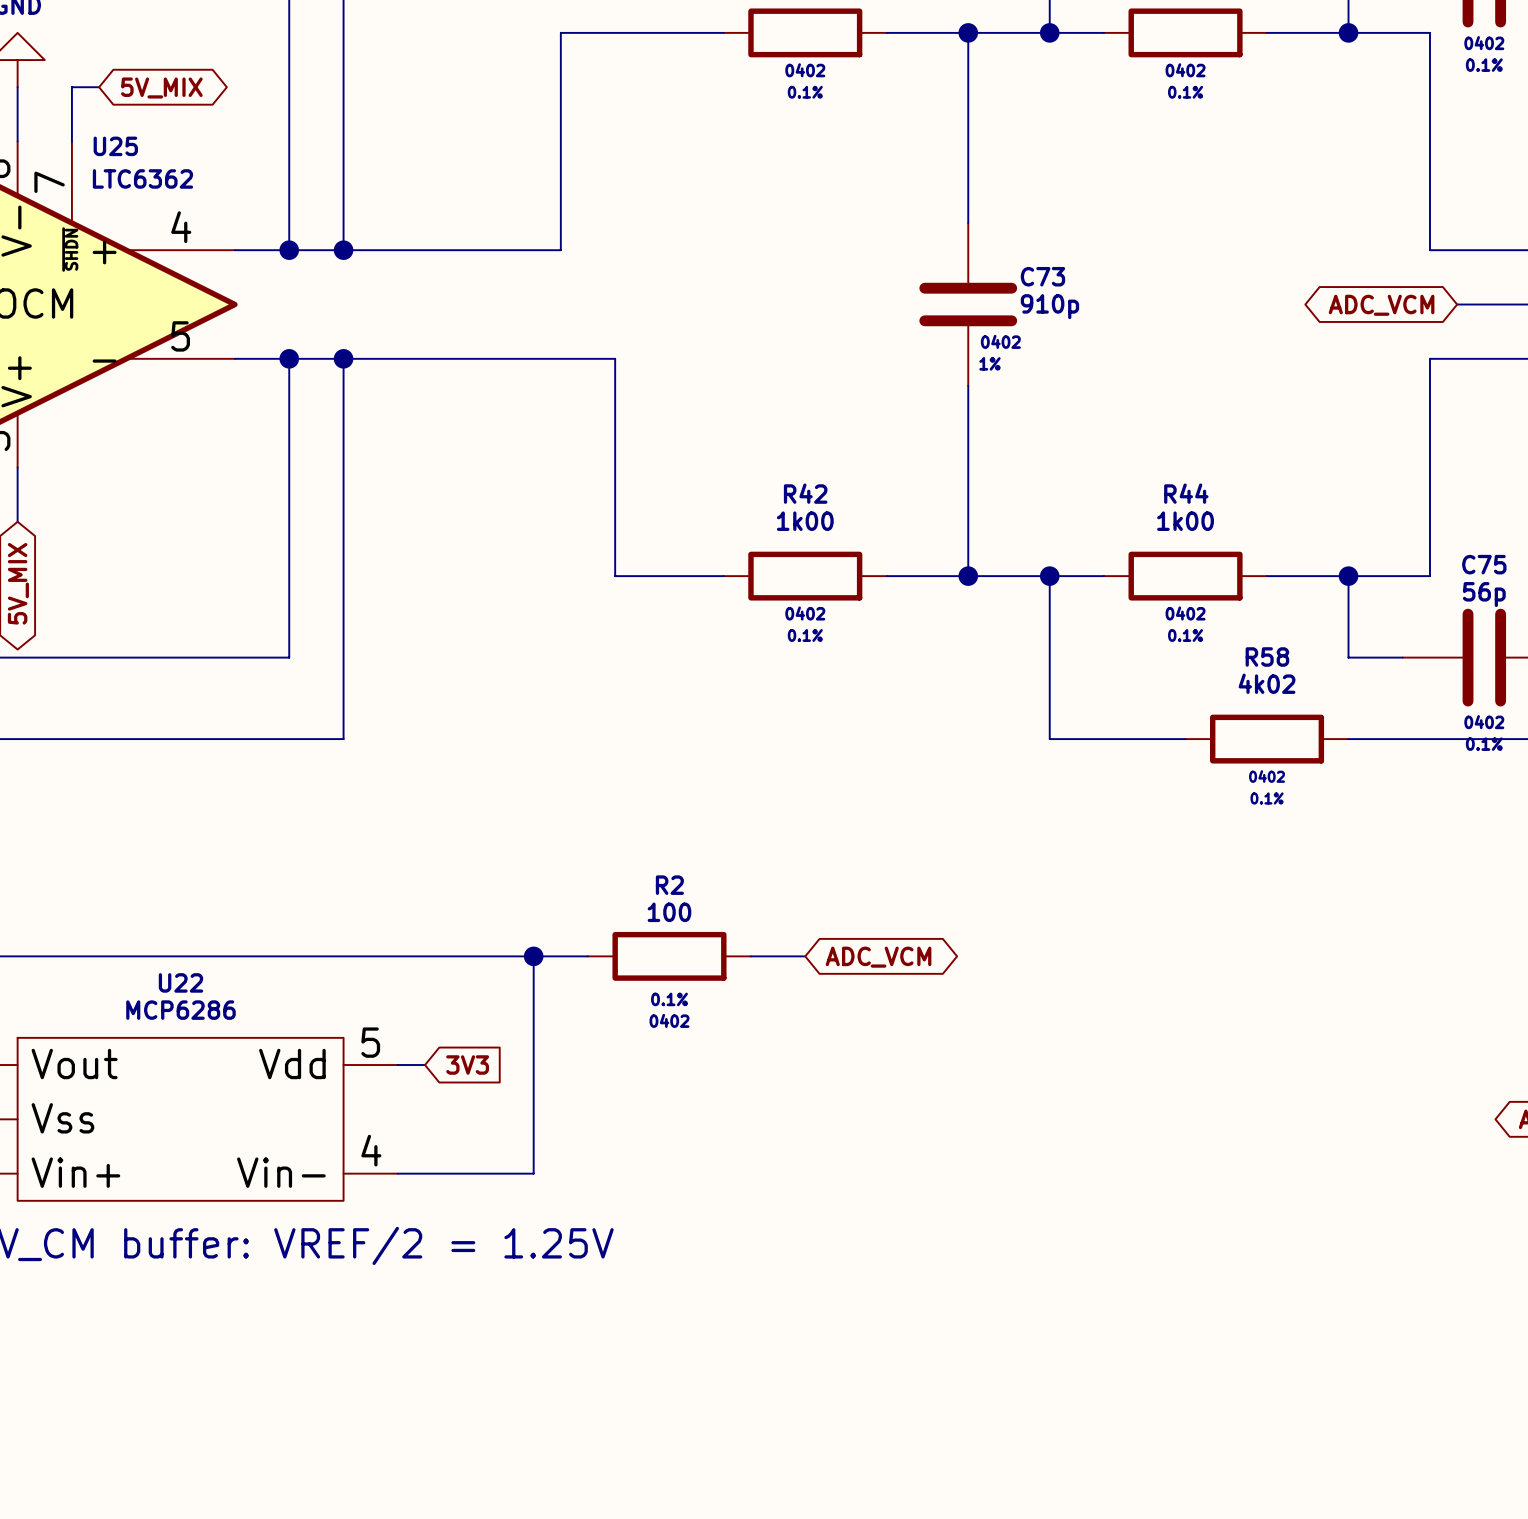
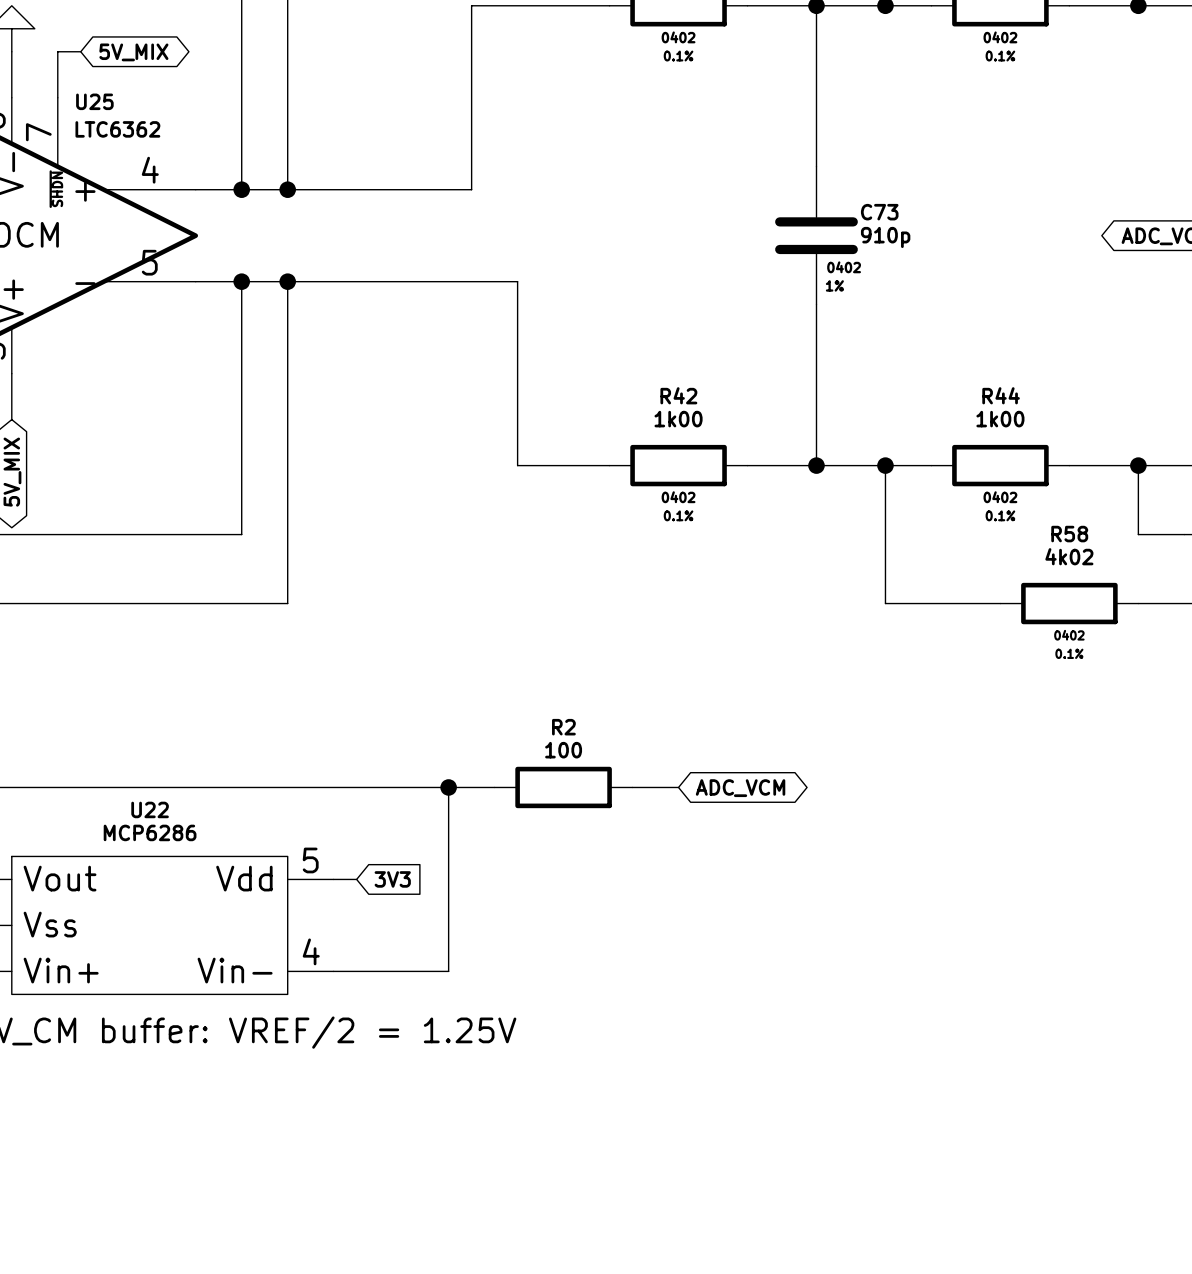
R2 text: 0.1% (669, 999) -> none
R2 text: 0402 (669, 1020) -> none

